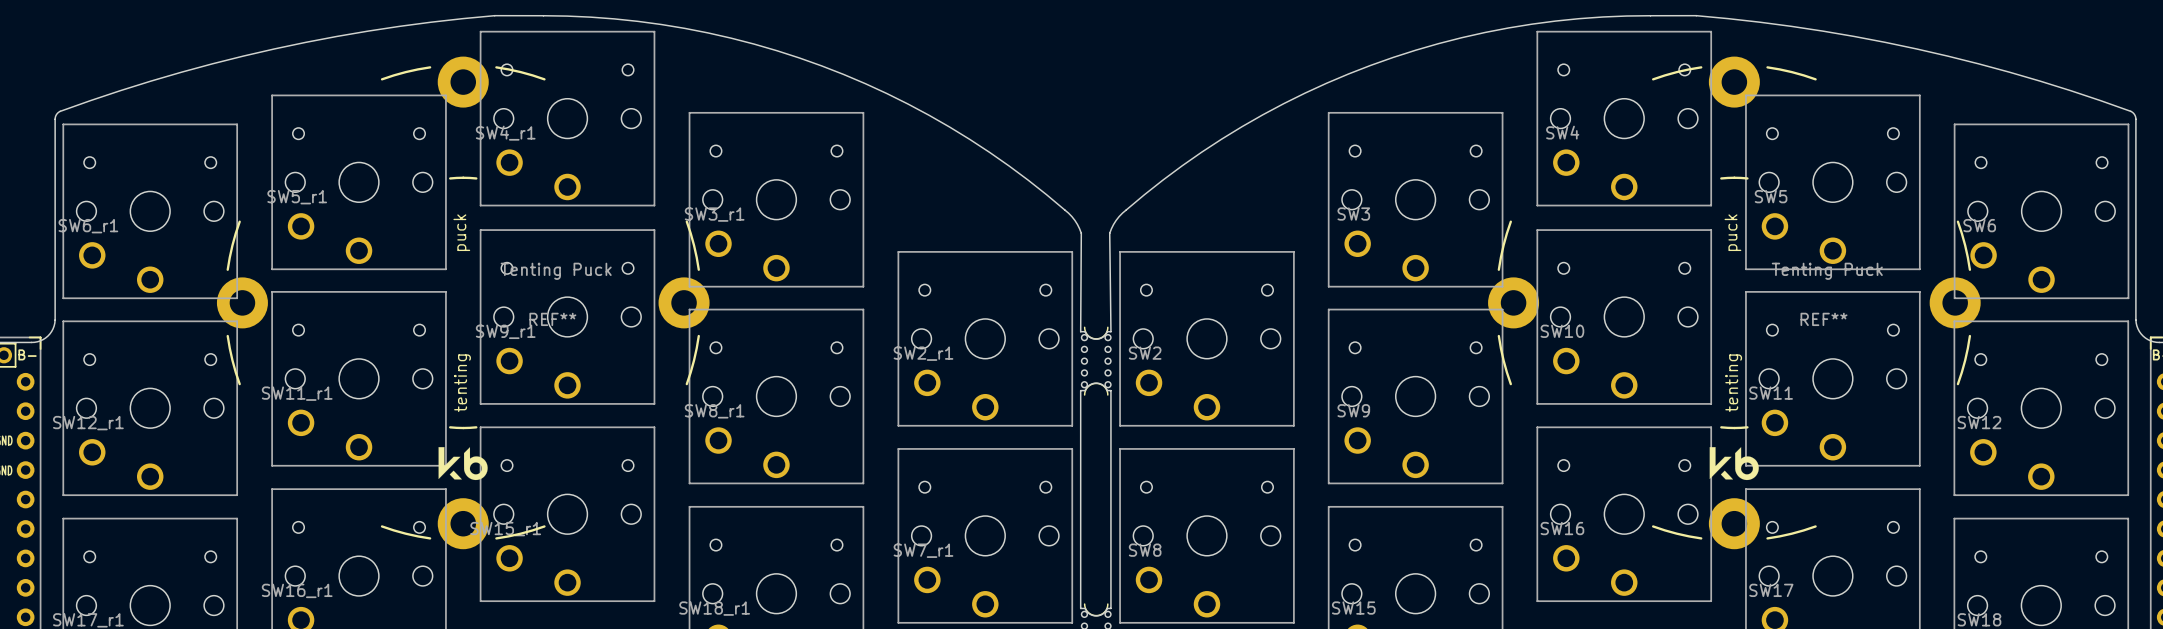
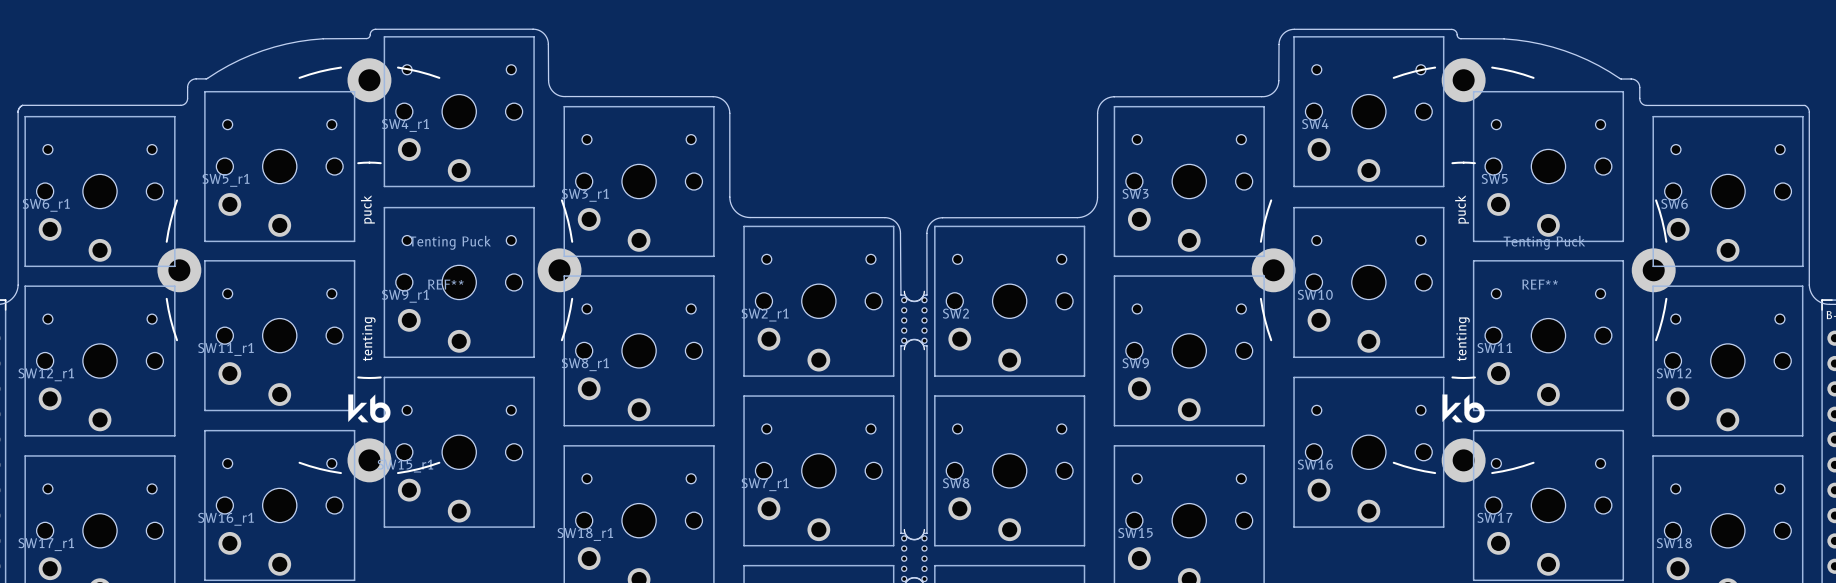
board edge: (60, 111) (150, 81) (243, 56) (336, 36) (431, 22) (494, 15) (567, 16) (637, 21) (708, 32) (799, 57) (887, 93) (969, 139) (1046, 194) (1071, 216) (1081, 233) (1080, 331) -> (18, 285) (18, 112) (22, 105) (181, 105) (186, 101) (187, 85) (191, 80) (206, 78) (239, 59) (286, 43) (323, 38) (366, 38) (371, 30) (375, 29) (533, 29) (542, 32) (547, 39) (549, 84) (552, 90) (558, 95) (713, 96) (724, 101) (729, 113) (729, 199) (734, 209) (741, 215) (750, 217) (884, 217) (894, 221) (900, 231) (900, 295)
board edge: (2130, 111) (2040, 81) (1947, 56) (1854, 36) (1759, 22) (1696, 15) (1626, 16) (1555, 21) (1485, 32) (1393, 57) (1305, 93) (1221, 139) (1144, 194) (1119, 216) (1109, 233) (1110, 331) -> (1804, 105) (1645, 105) (1640, 100) (1639, 86) (1636, 80) (1620, 78) (1576, 55) (1528, 41) (1504, 38) (1460, 38) (1452, 29) (1290, 29) (1284, 32) (1279, 39) (1278, 84) (1274, 91) (1268, 95) (1114, 96) (1102, 101) (1097, 113) (1097, 199) (1093, 209) (1086, 215) (1077, 217) (942, 217) (932, 221) (927, 231) (927, 295)

